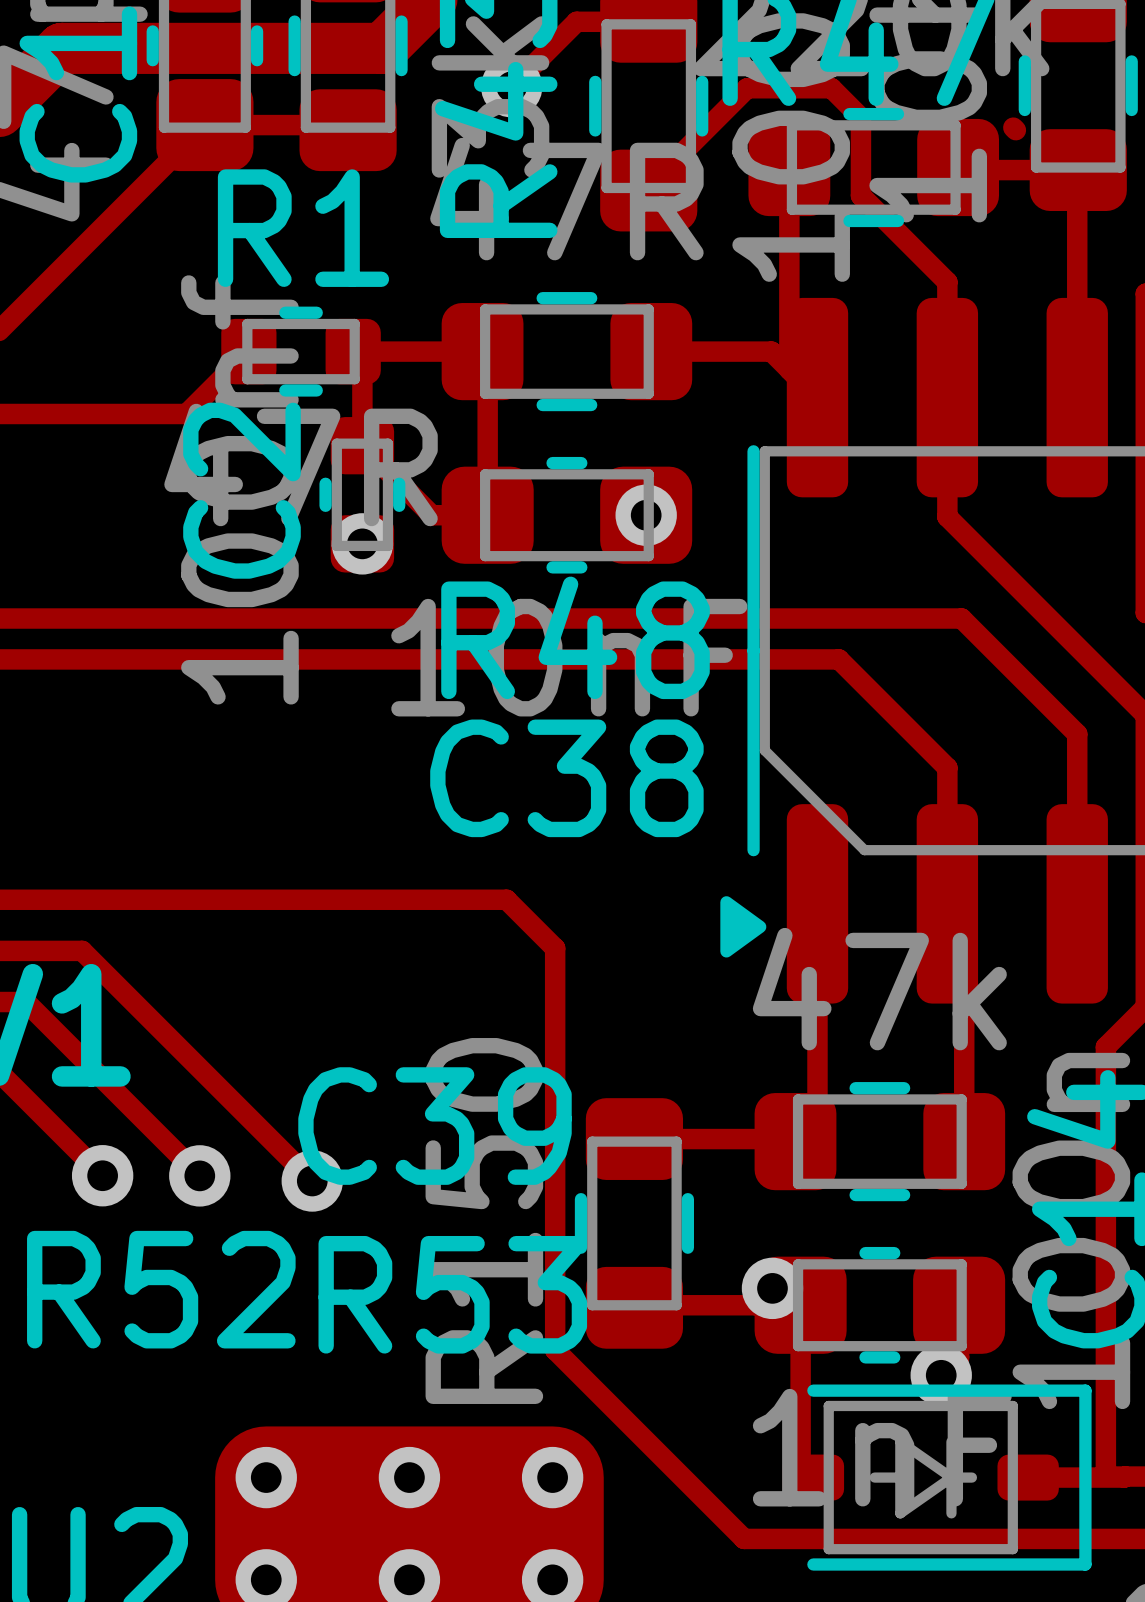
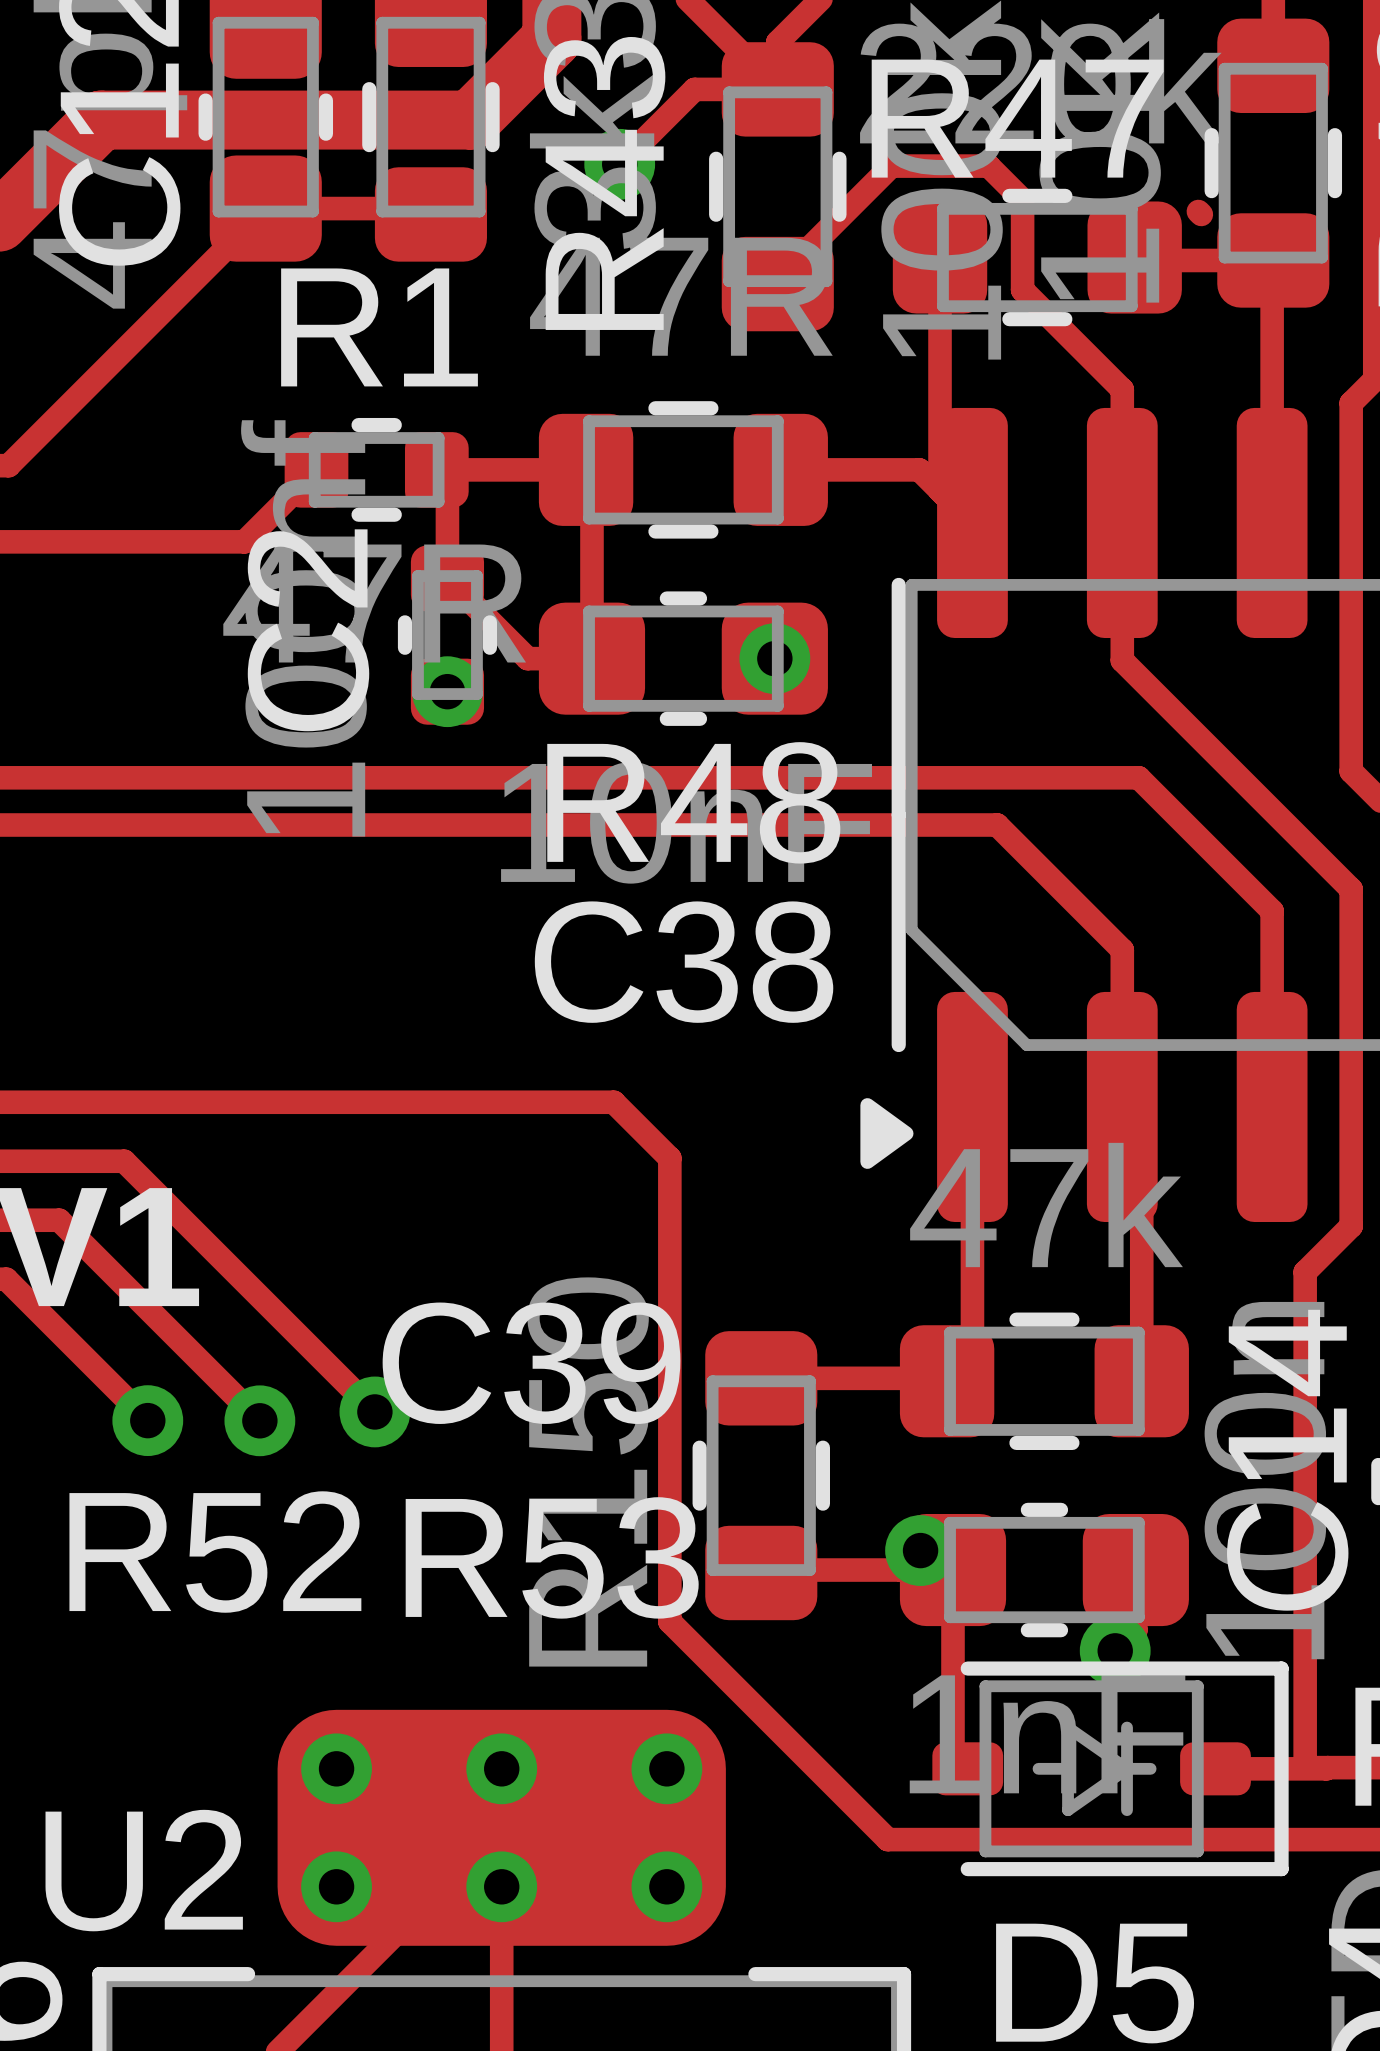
via position: (312, 1180) -> (374, 1411)

